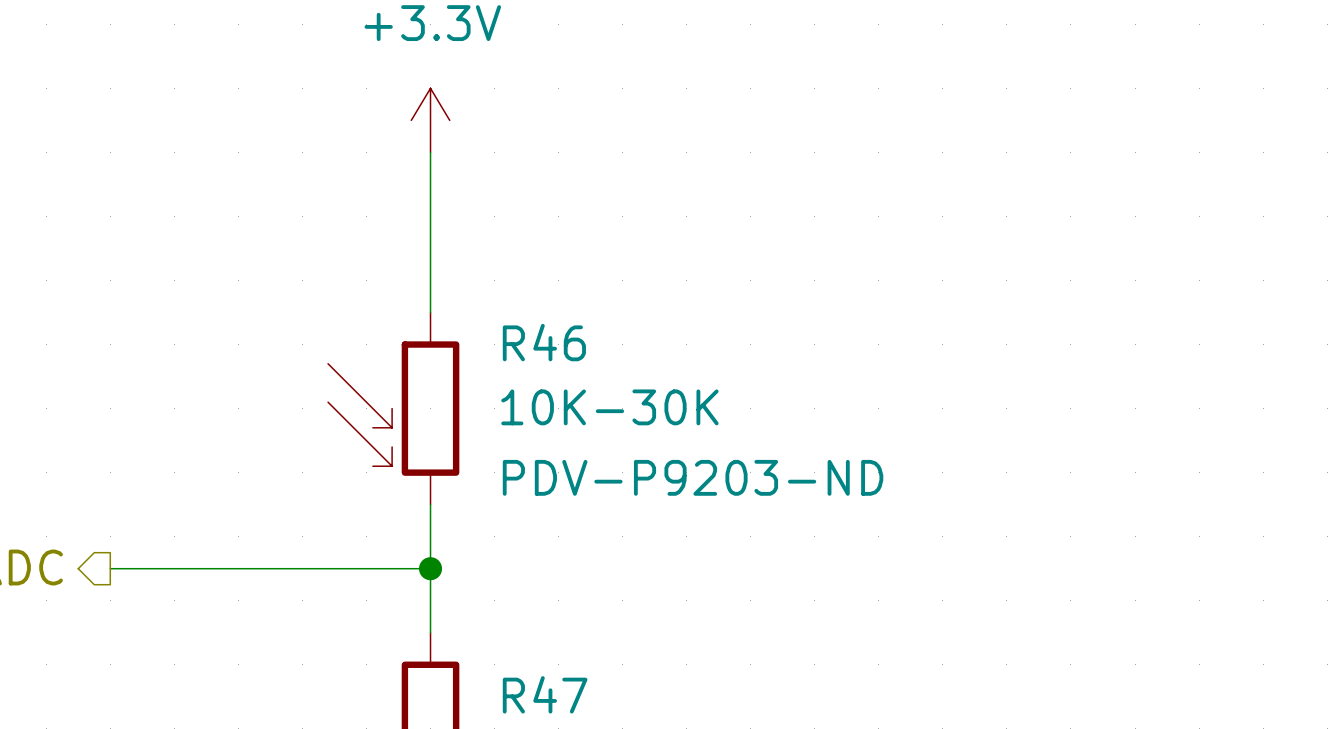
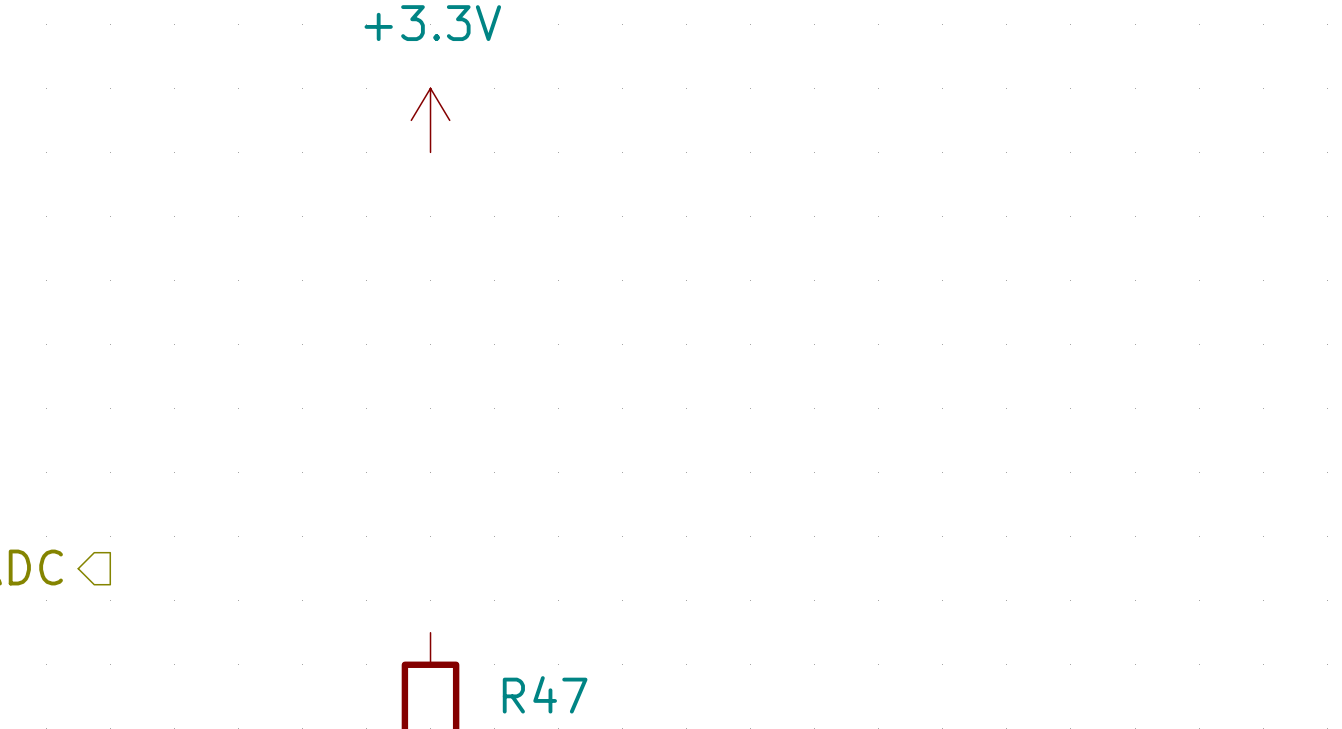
wire: (430, 152) (430, 312) -> none
R46: 10K-30K (393, 408) -> none
wire: (430, 504) (430, 632) -> none
wire: (110, 568) (430, 568) -> none
junction: (430, 568) -> none

